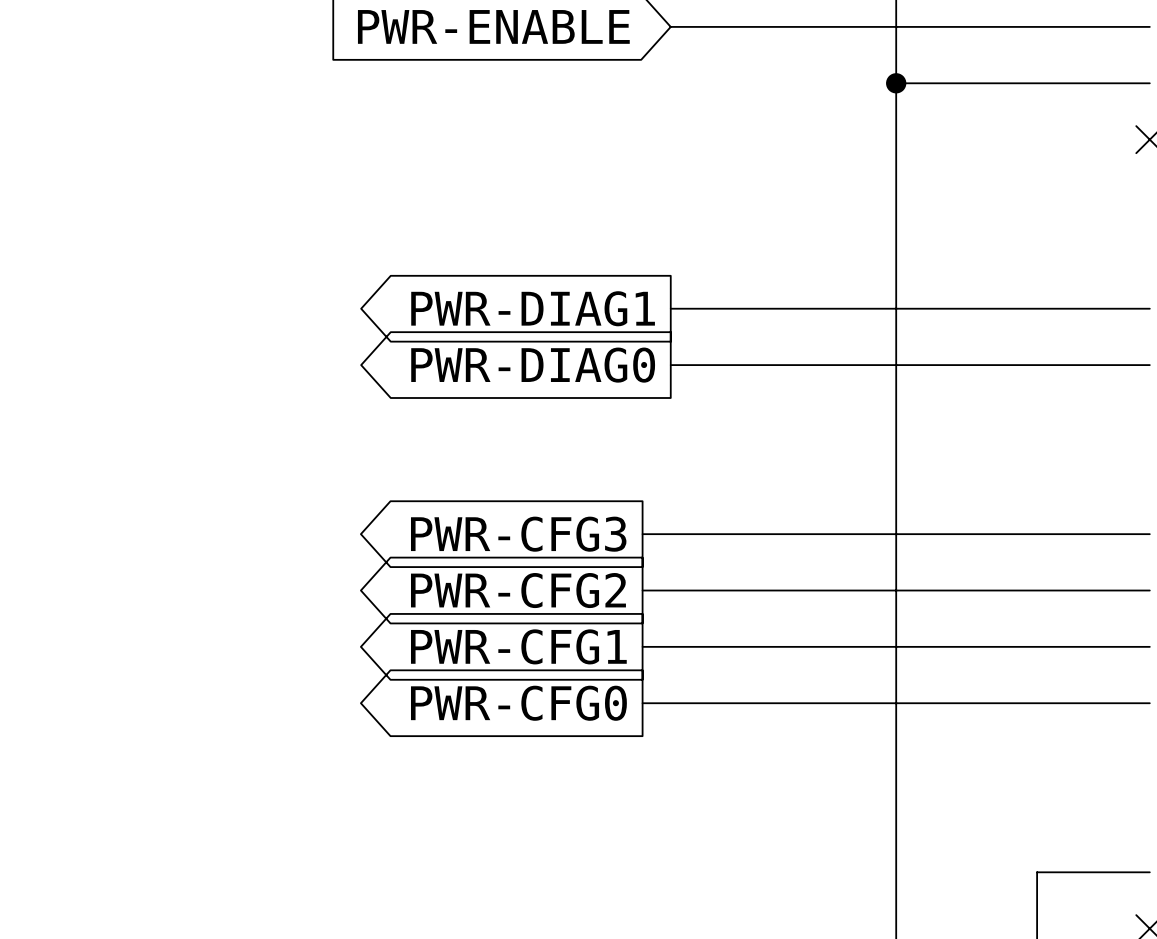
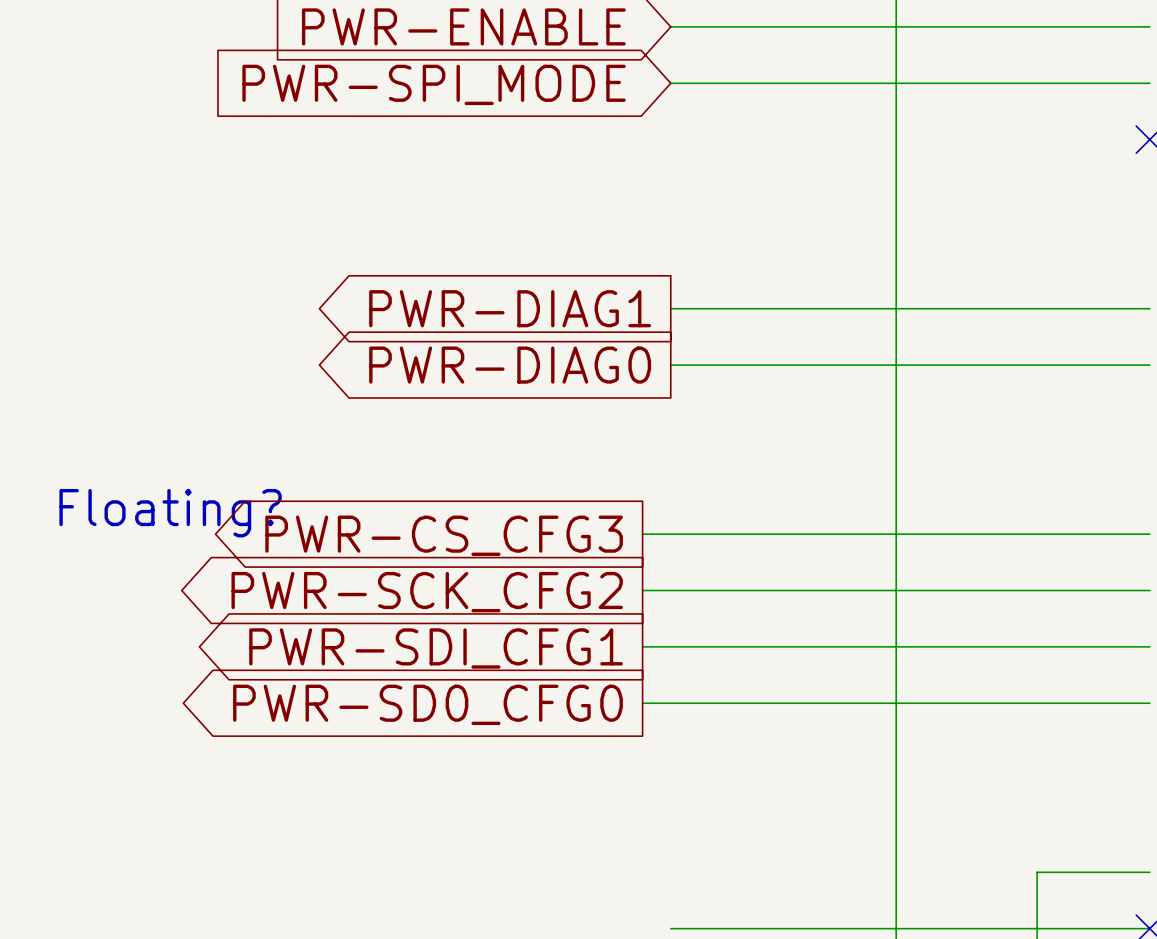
wire: none -> (670, 83) (896, 83)
junction: (896, 83) -> none
global label: none -> PWR-SPI_MODE (434, 84)
text: none -> Floating? (170, 513)
global label: PWR-CFG3 (518, 534) -> PWR-CS_CFG3 (444, 535)
global label: PWR-CFG2 (518, 590) -> PWR-SCK_CFG2 (427, 592)
global label: PWR-CFG1 (518, 646) -> PWR-SDI_CFG1 (436, 648)
global label: PWR-CFG0 (518, 703) -> PWR-SD0_CFG0 (428, 704)
wire: none -> (670, 928) (1149, 928)

